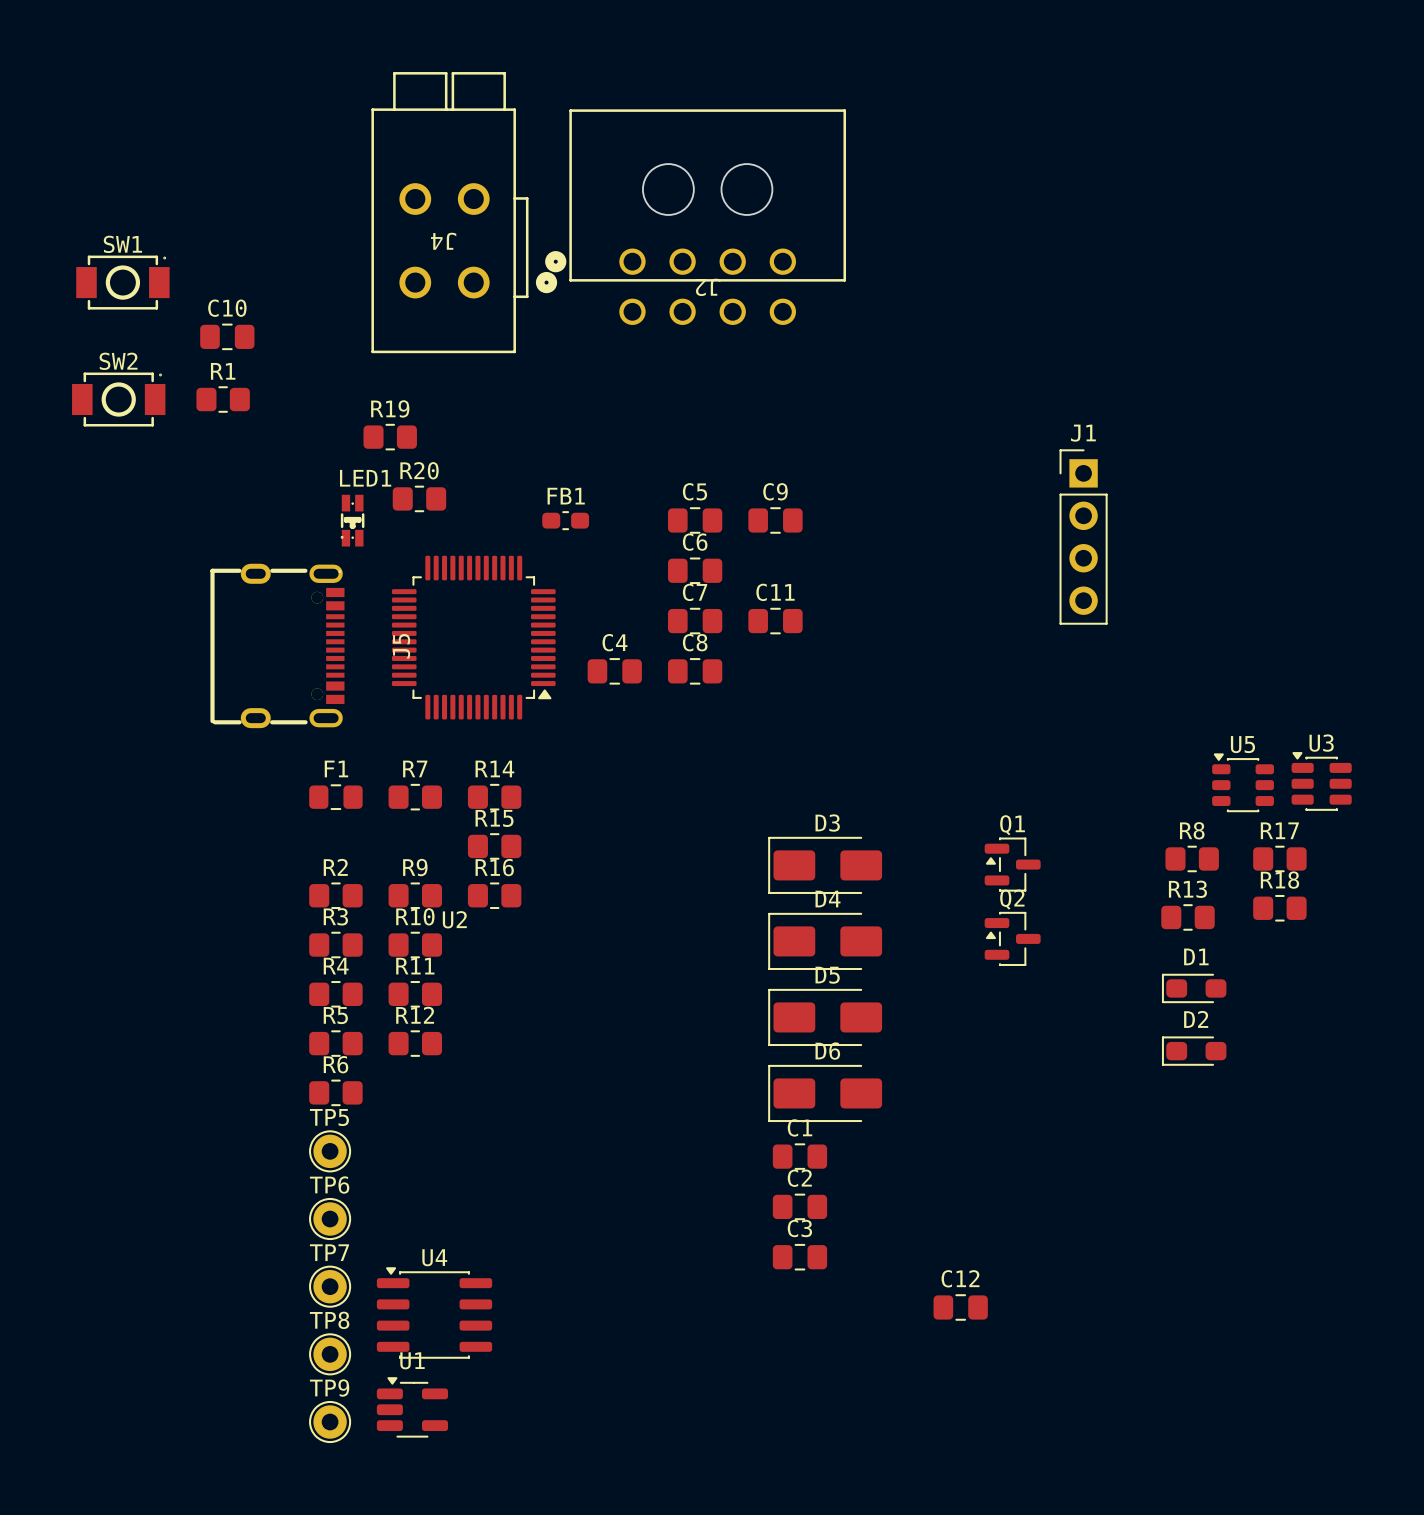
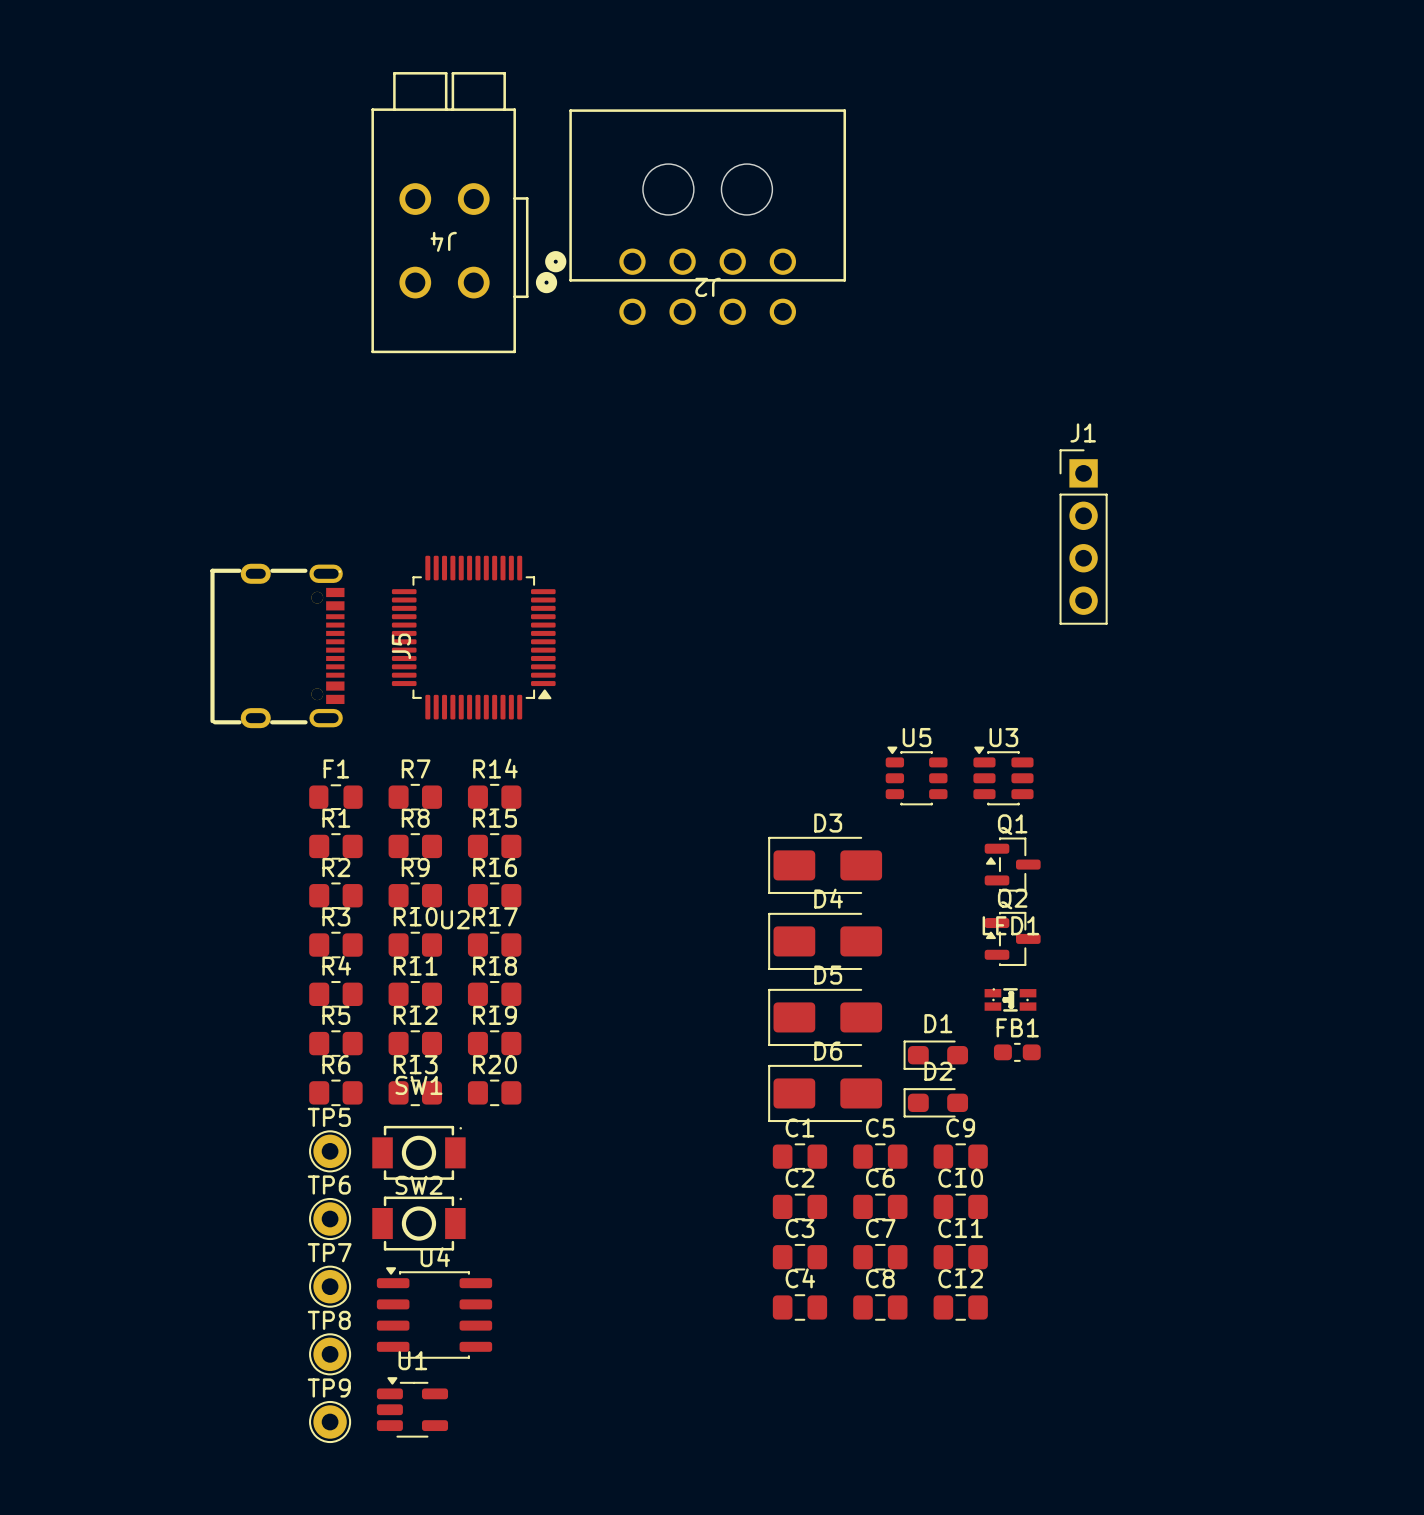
SW1 name position: SW1 (122, 244) -> SW1 (418, 1085)
SW1 position: (122, 282) -> (418, 1152)
C10 position: (227, 336) -> (960, 1206)
SW2 position: (118, 399) -> (418, 1223)
R1 position: (223, 399) -> (335, 846)
R19 position: (390, 437) -> (494, 1043)
LED1 name position: LED1 (365, 478) -> LED1 (1010, 925)
R20 position: (419, 498) -> (494, 1092)
LED1 rotation: 0° (352, 520) -> 90° clockwise (1010, 999)
LED1 position: (352, 520) -> (1010, 999)
FB1 position: (565, 520) -> (1017, 1052)
C5 position: (695, 520) -> (880, 1156)
C9 position: (775, 520) -> (960, 1156)
C6 position: (695, 570) -> (880, 1206)
C7 position: (695, 621) -> (880, 1257)
C11 position: (775, 621) -> (960, 1257)
C4 position: (614, 671) -> (799, 1307)
C8 position: (695, 671) -> (880, 1307)
U3 position: (1321, 781) -> (1003, 775)
U5 position: (1243, 782) -> (916, 775)
R8 position: (1192, 858) -> (415, 846)
R17 position: (1279, 858) -> (494, 945)
R18 position: (1279, 908) -> (494, 994)
R13 position: (1188, 917) -> (415, 1092)
D1 position: (1194, 988) -> (935, 1055)
D2 position: (1194, 1051) -> (935, 1102)

